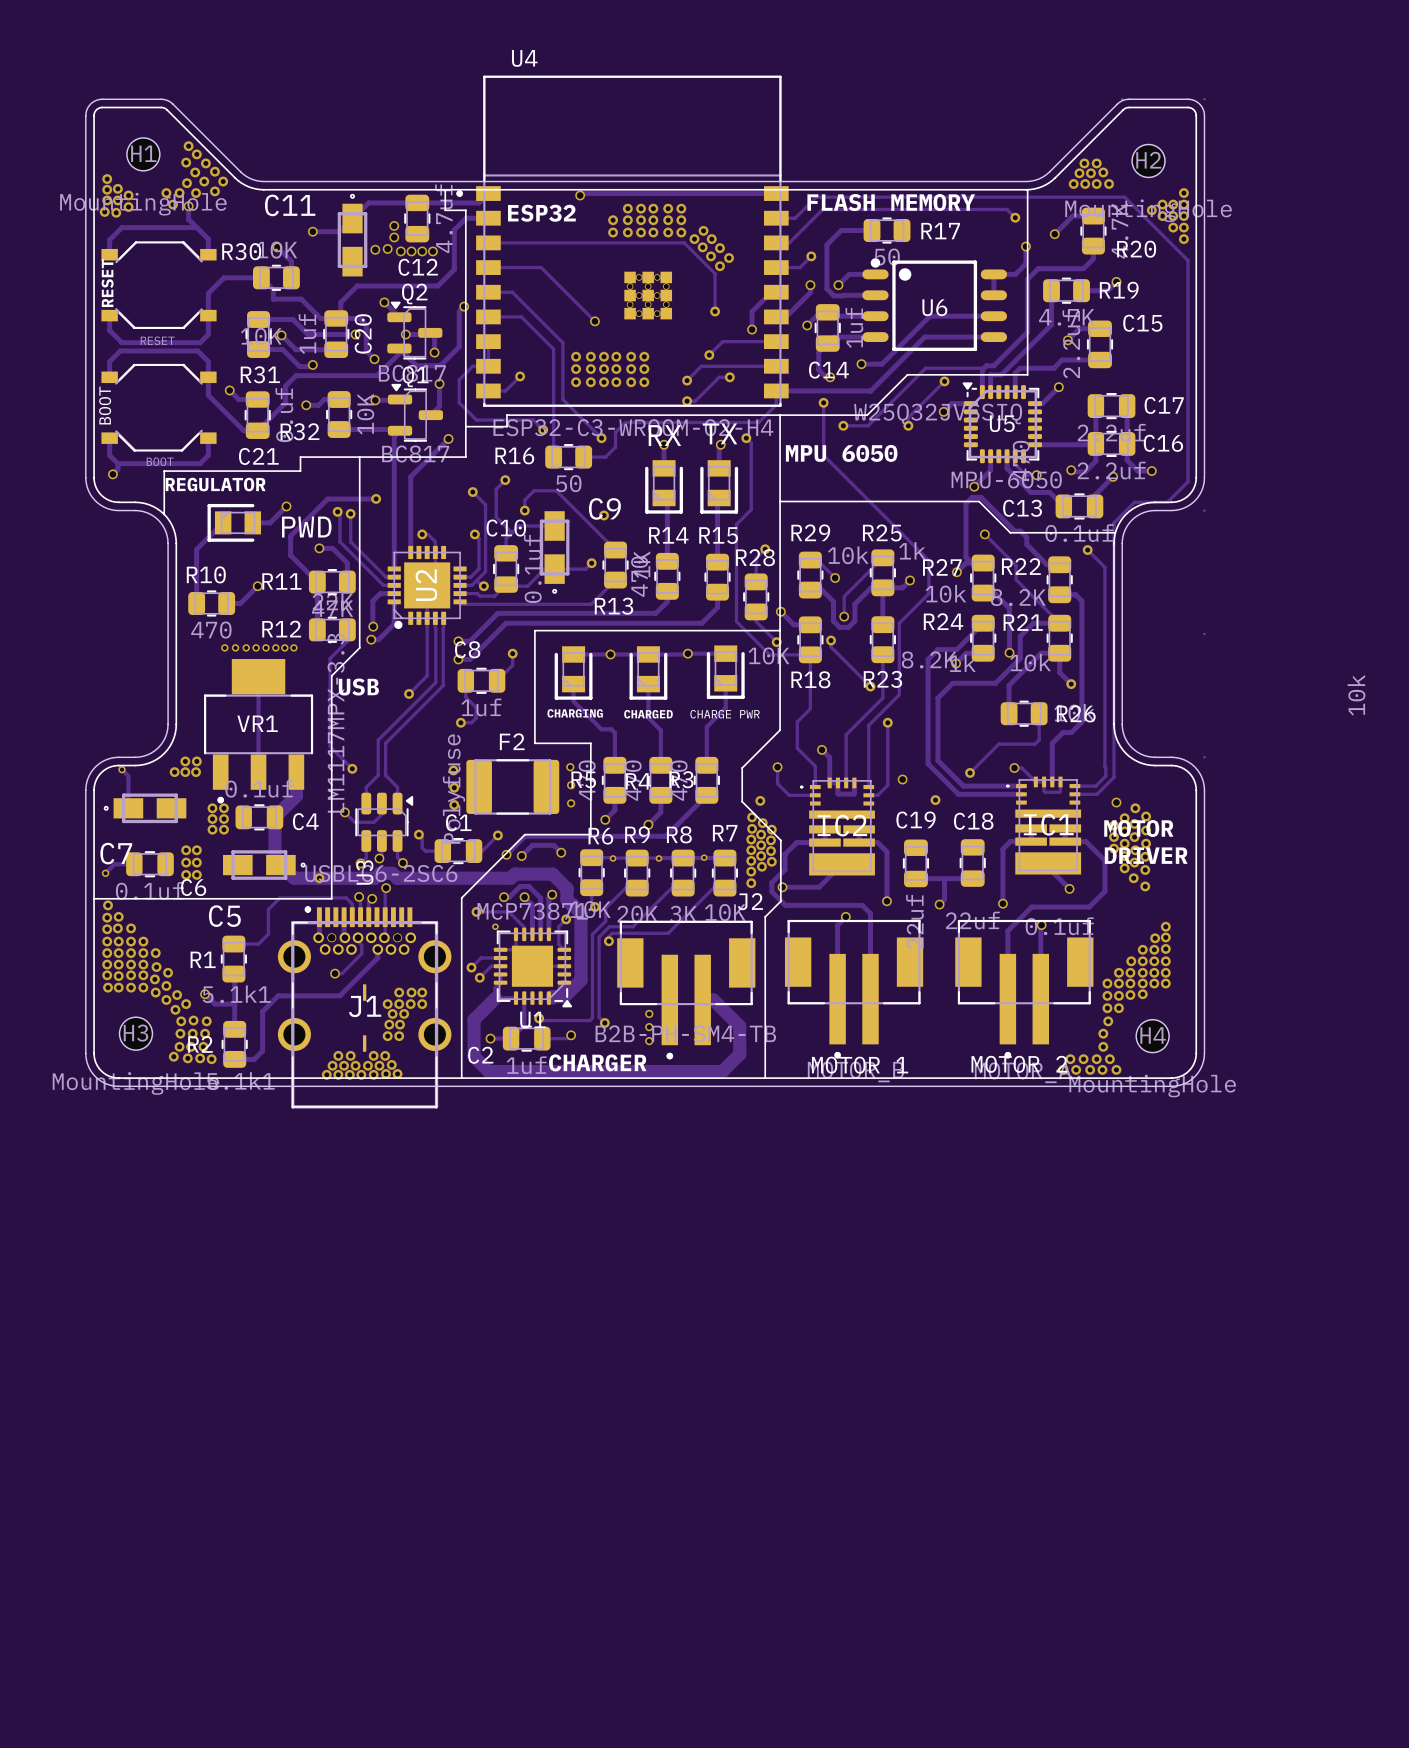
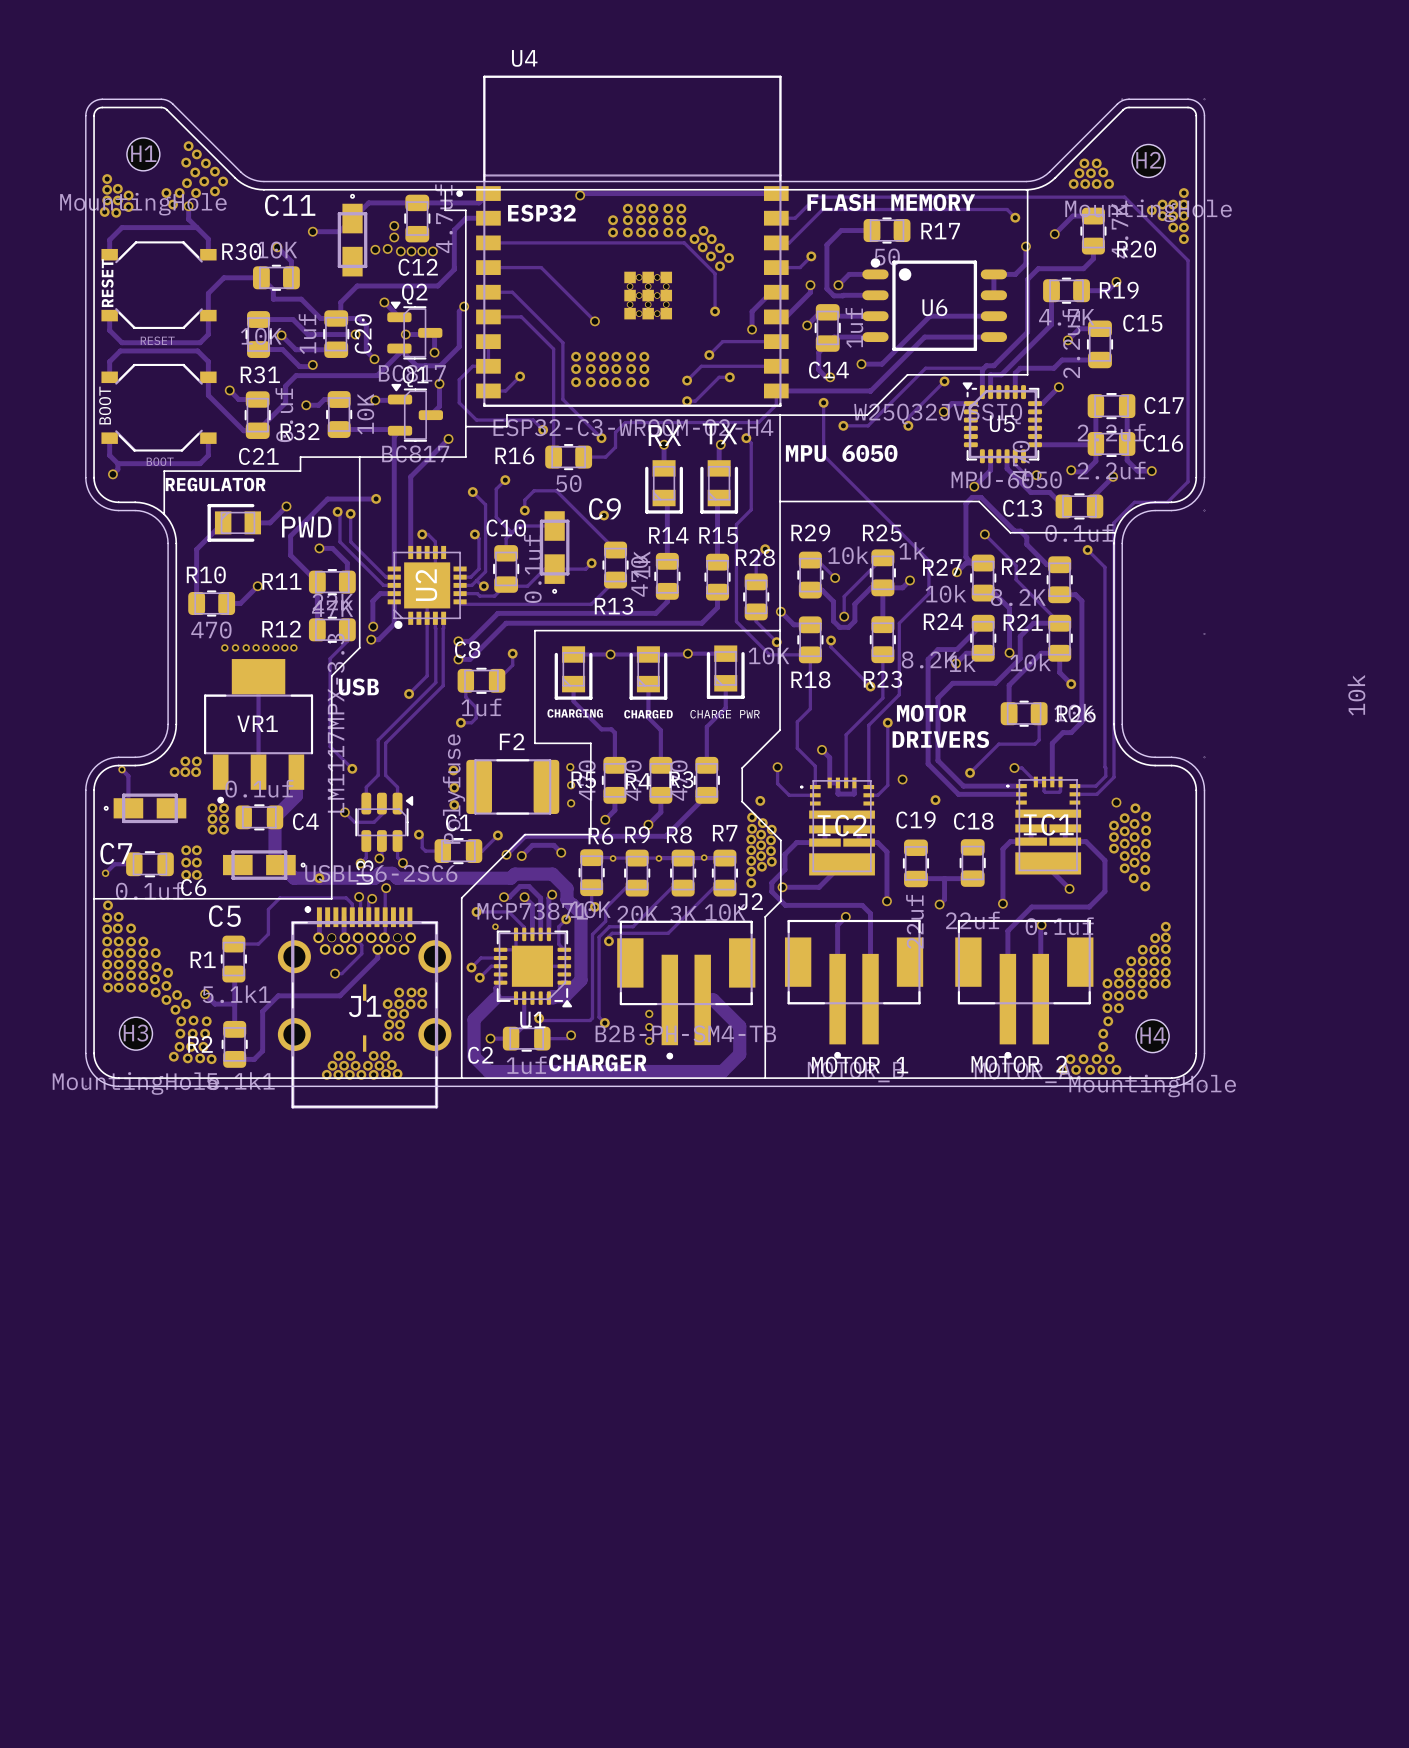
text: none -> DRIVERS (940, 739)
text position: MOTOR (1138, 828) -> MOTOR (931, 713)
text: DRIVER (1146, 855) -> none

